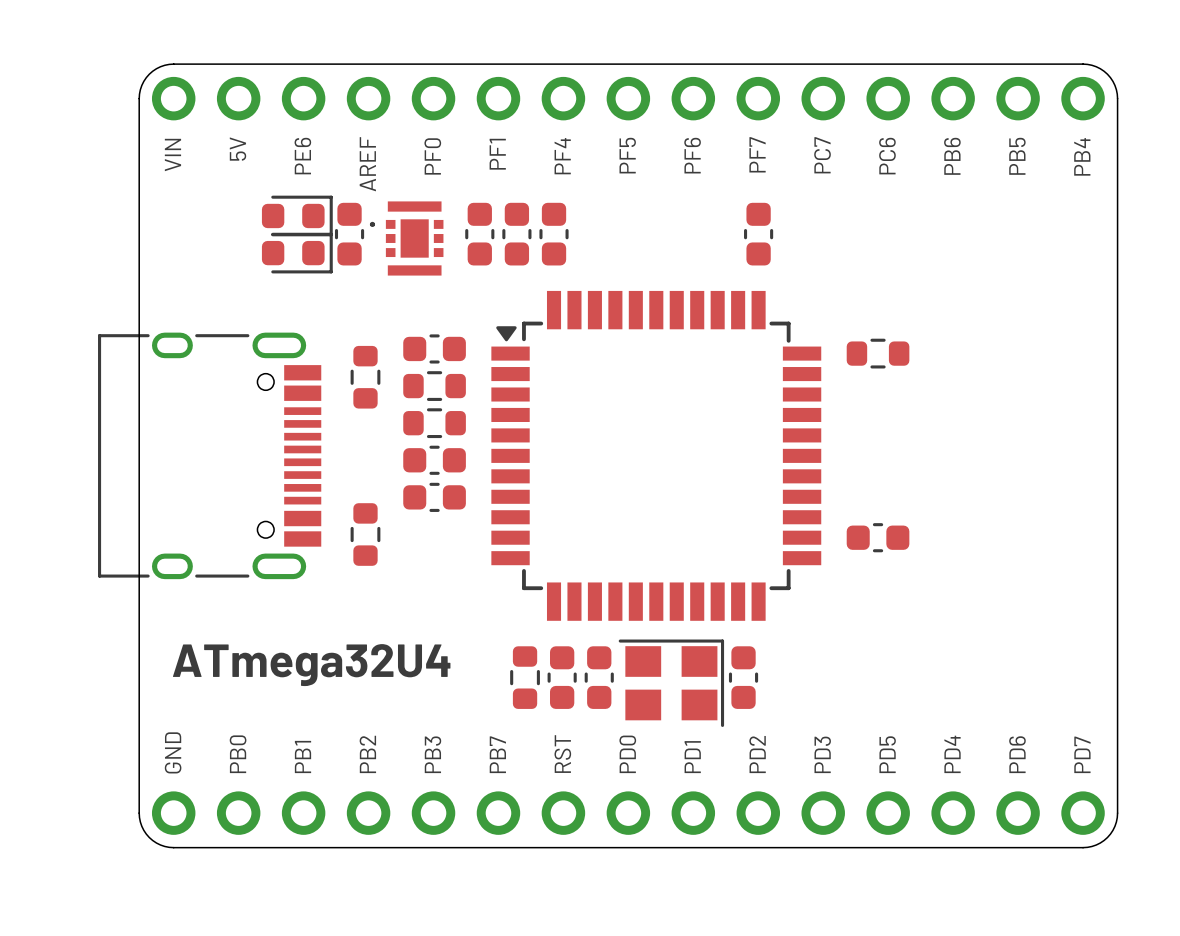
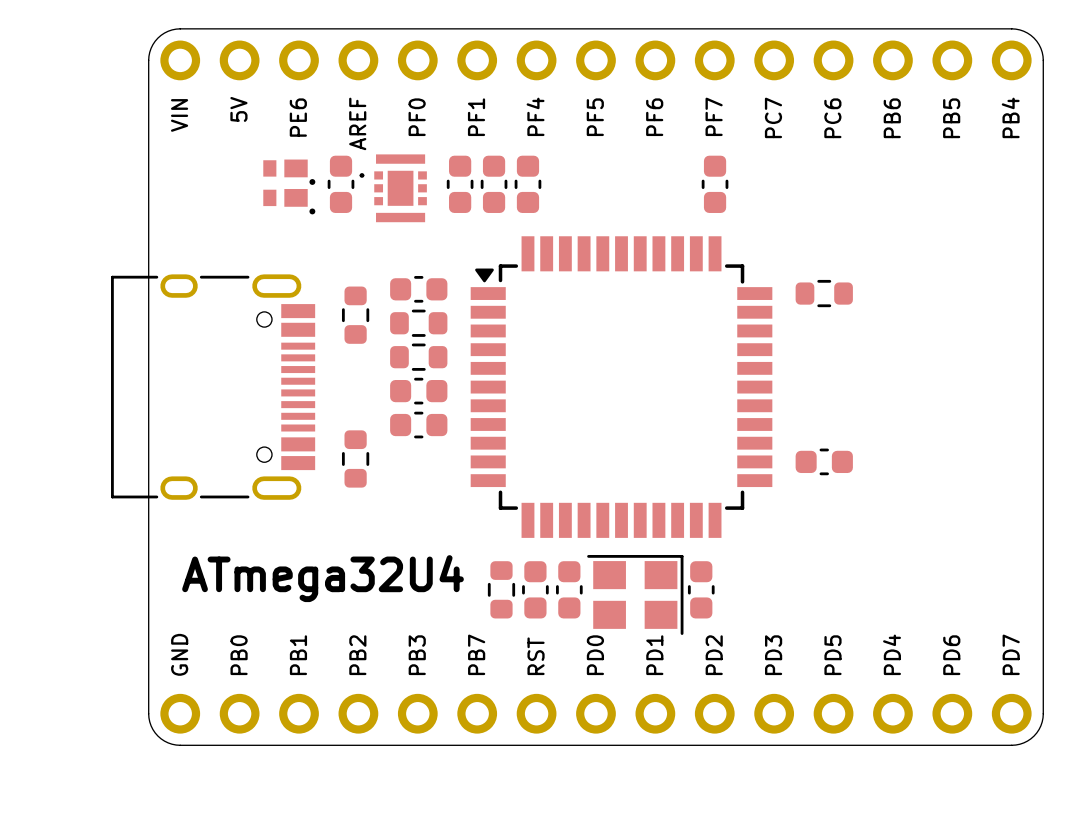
part footprint: [261, 195, 333, 237] -> [263, 159, 316, 185]
part footprint: [261, 232, 333, 274] -> [263, 189, 316, 215]

